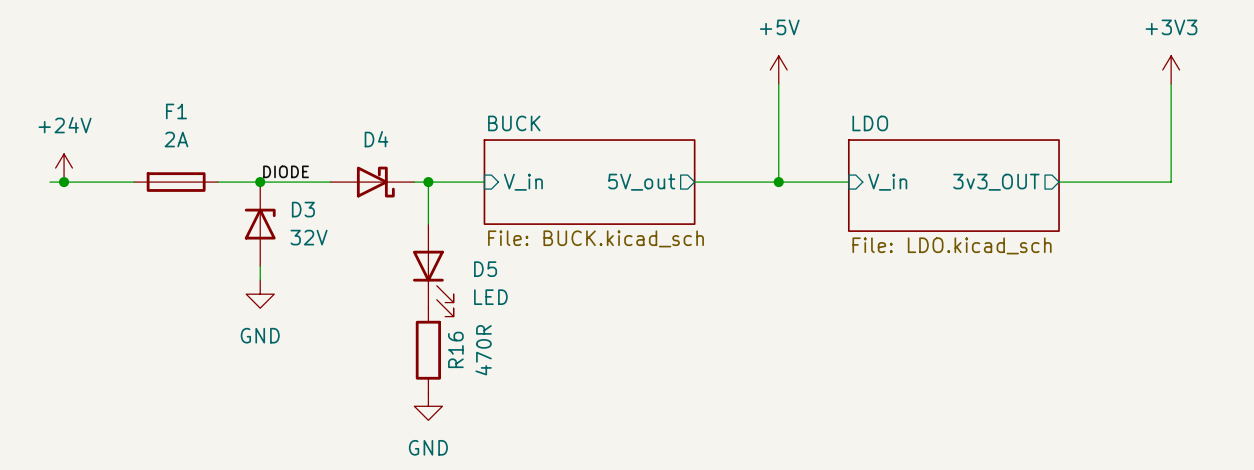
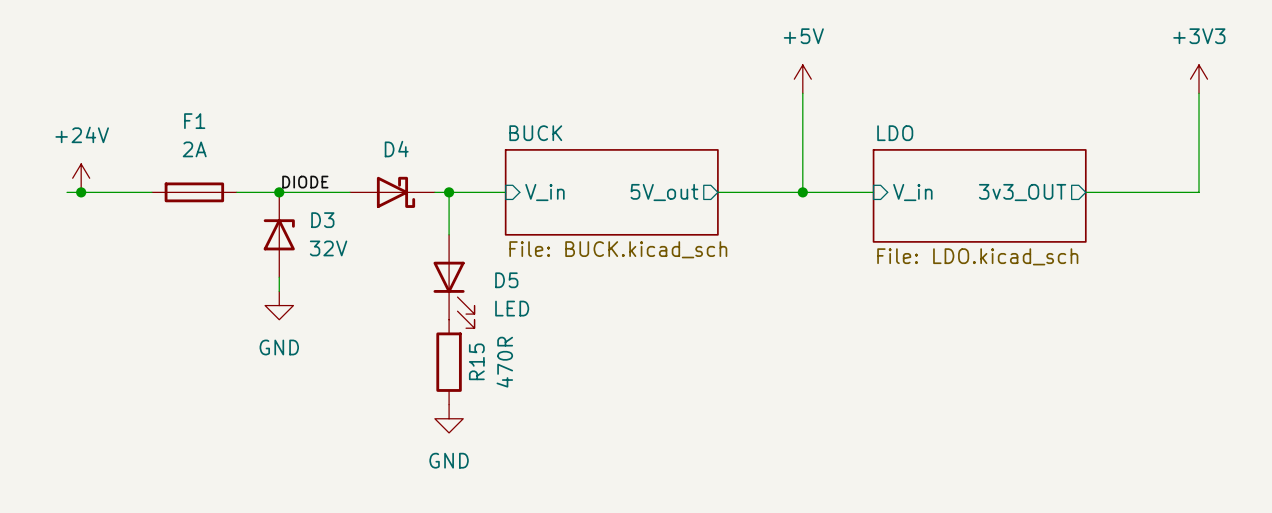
R16 name: R16 (455, 349) -> R15 (476, 361)

